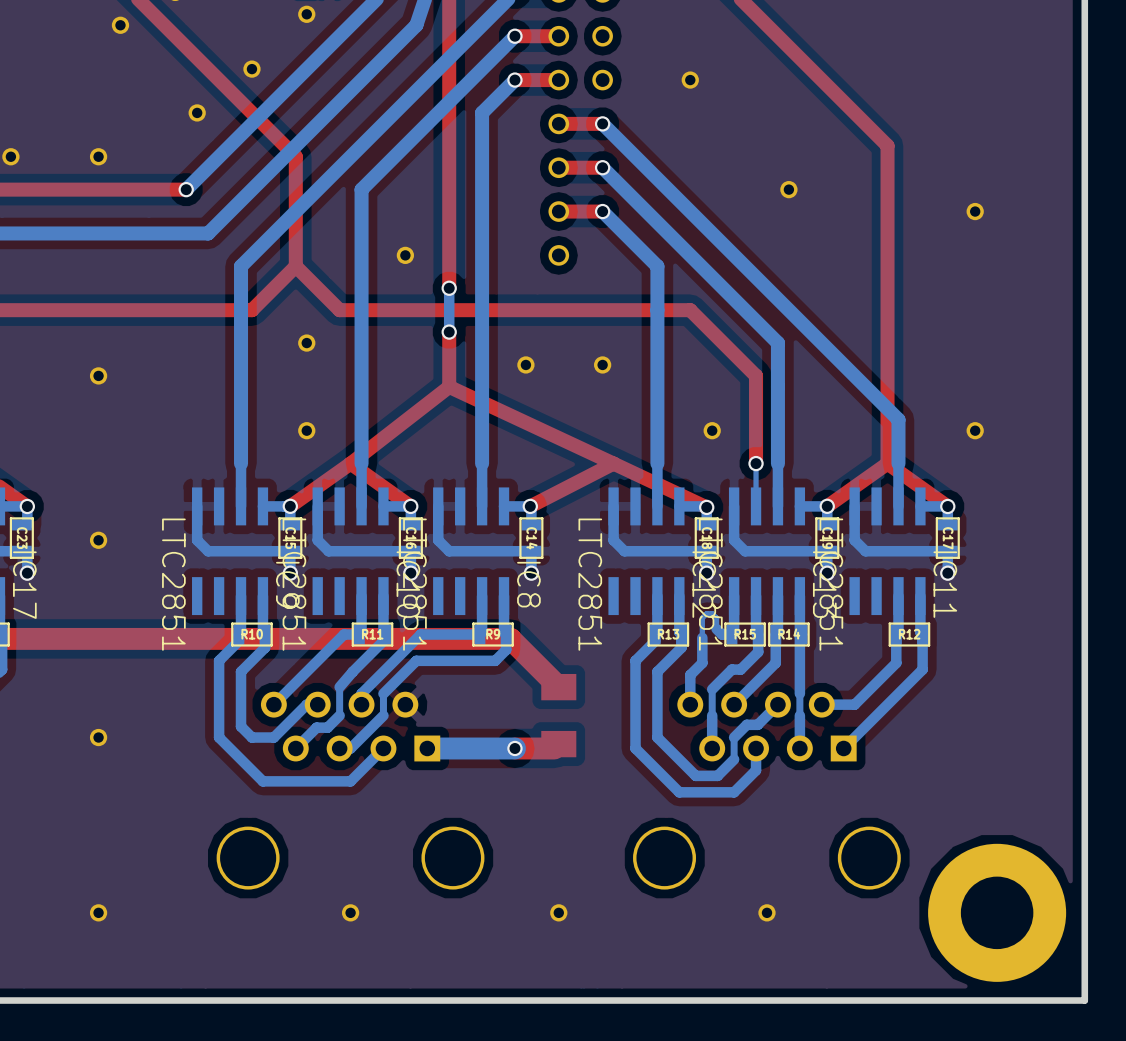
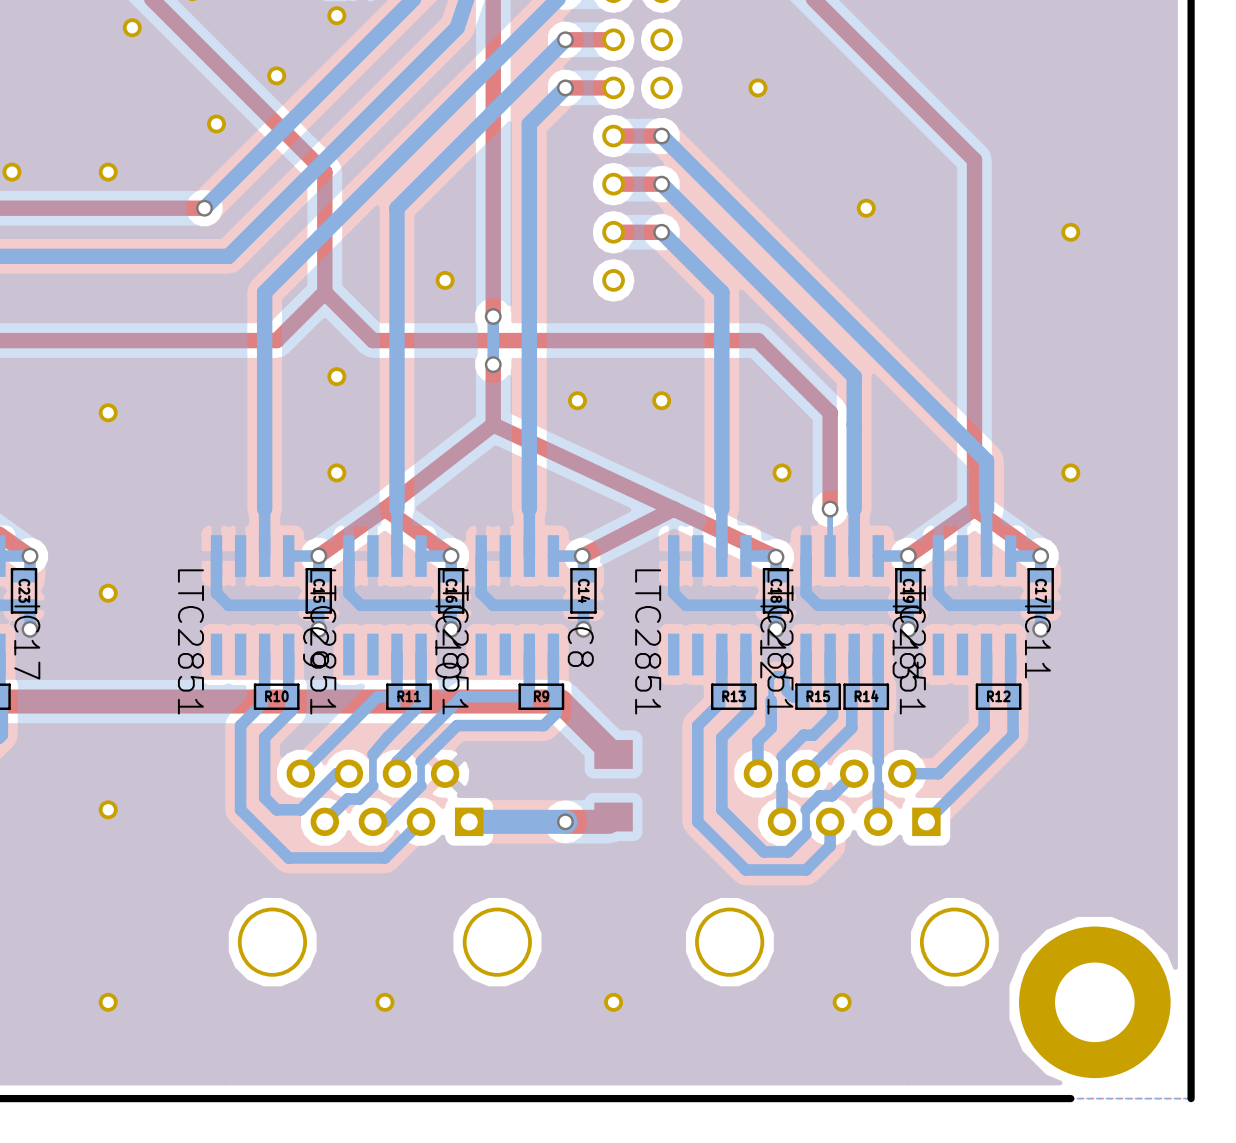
board edge: (1084, 1000) (975, 1000) -> none

